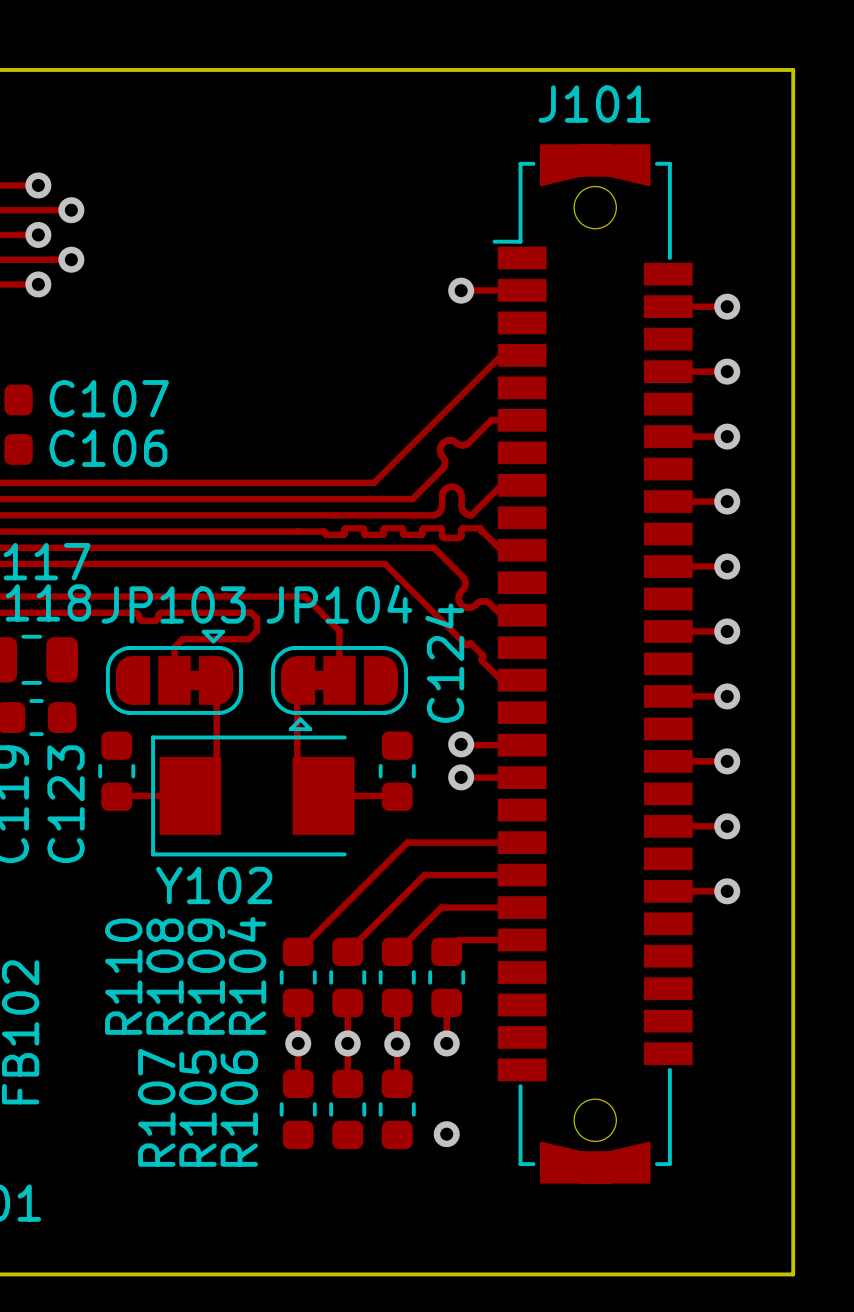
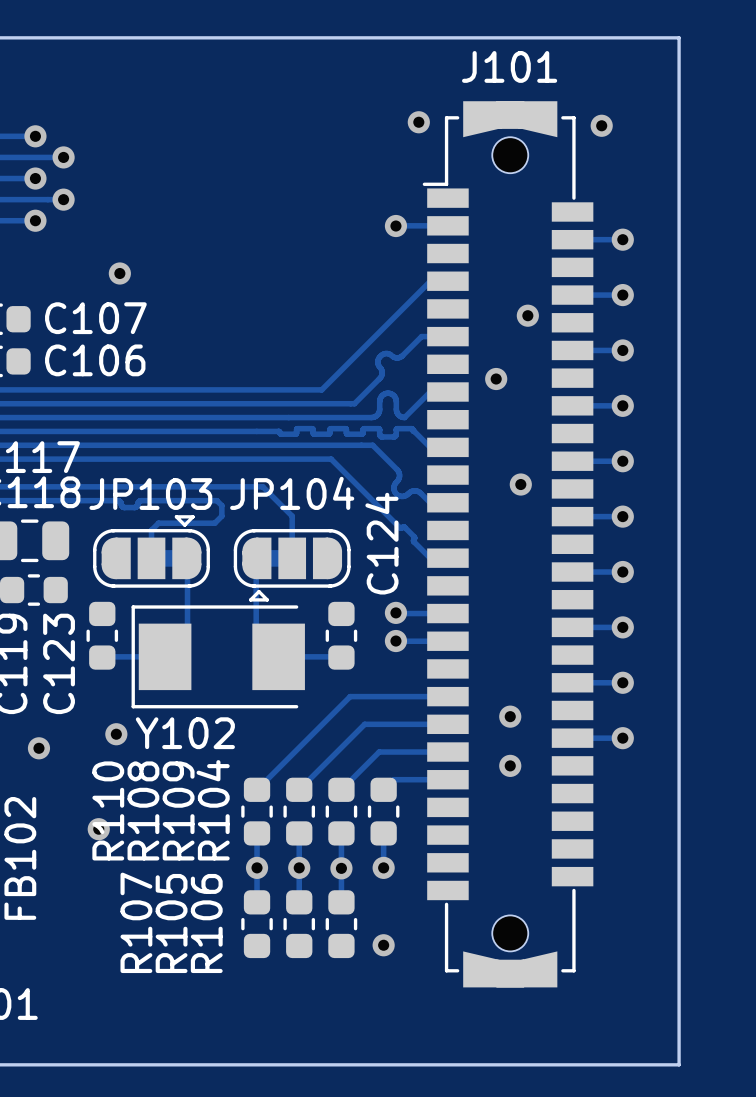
via: none -> (418, 122)
via: none -> (601, 125)
via: none -> (119, 273)
via: none -> (527, 315)
via: none -> (496, 379)
via: none -> (520, 484)
via: none -> (510, 716)
via: none -> (116, 734)
via: none -> (38, 748)
via: none -> (510, 765)
via: none -> (98, 829)

